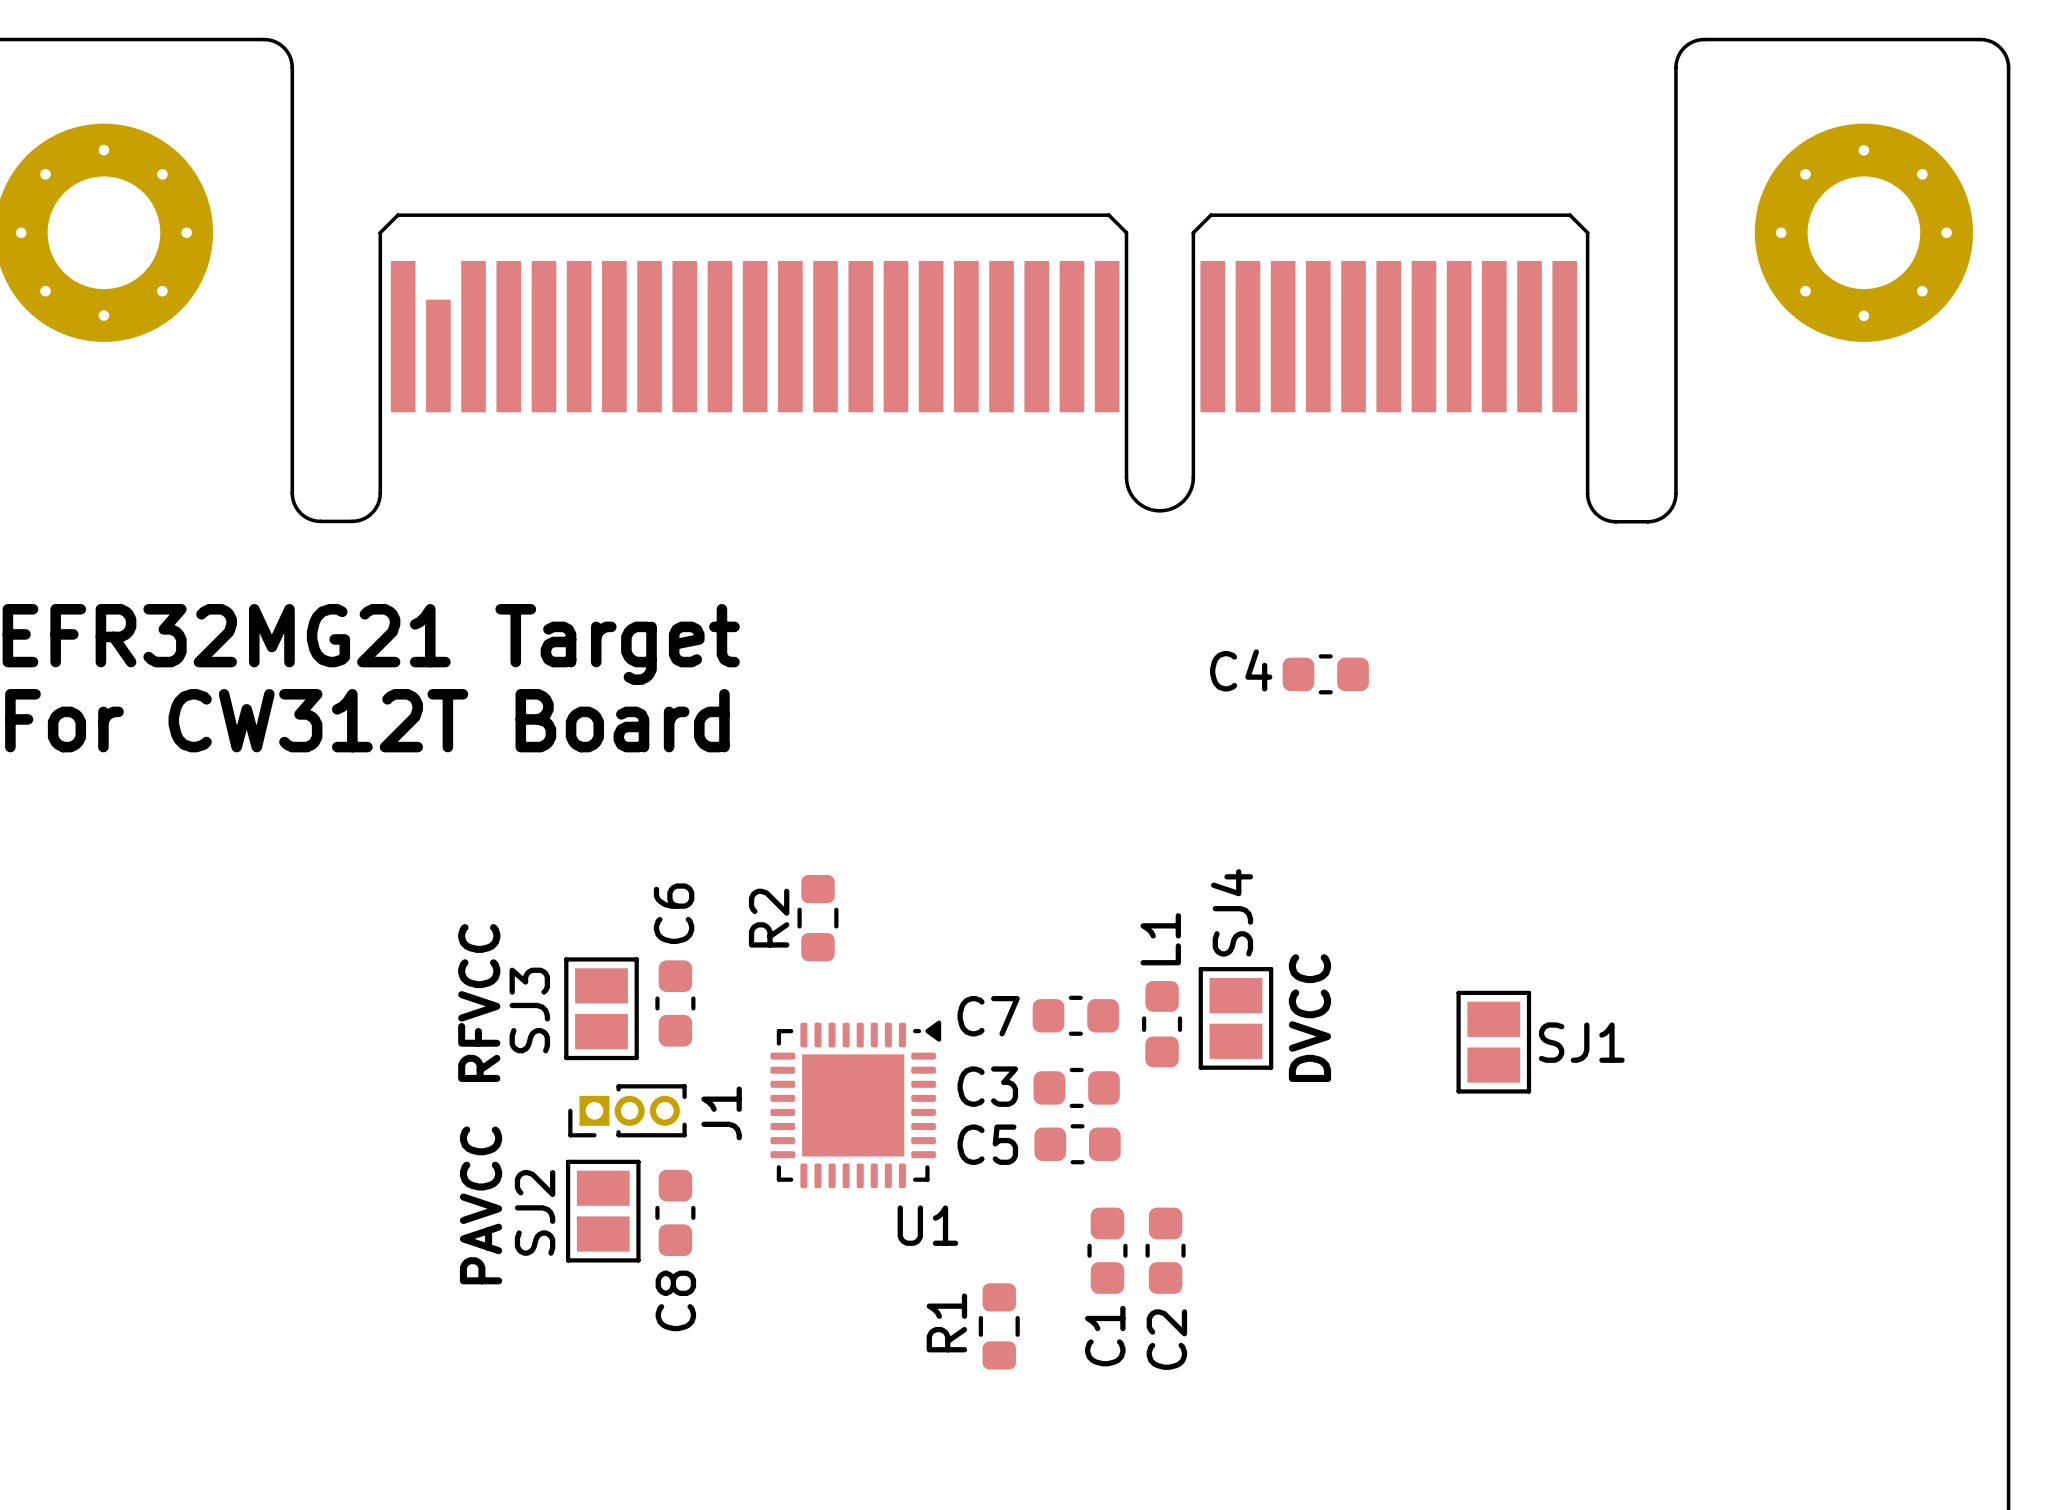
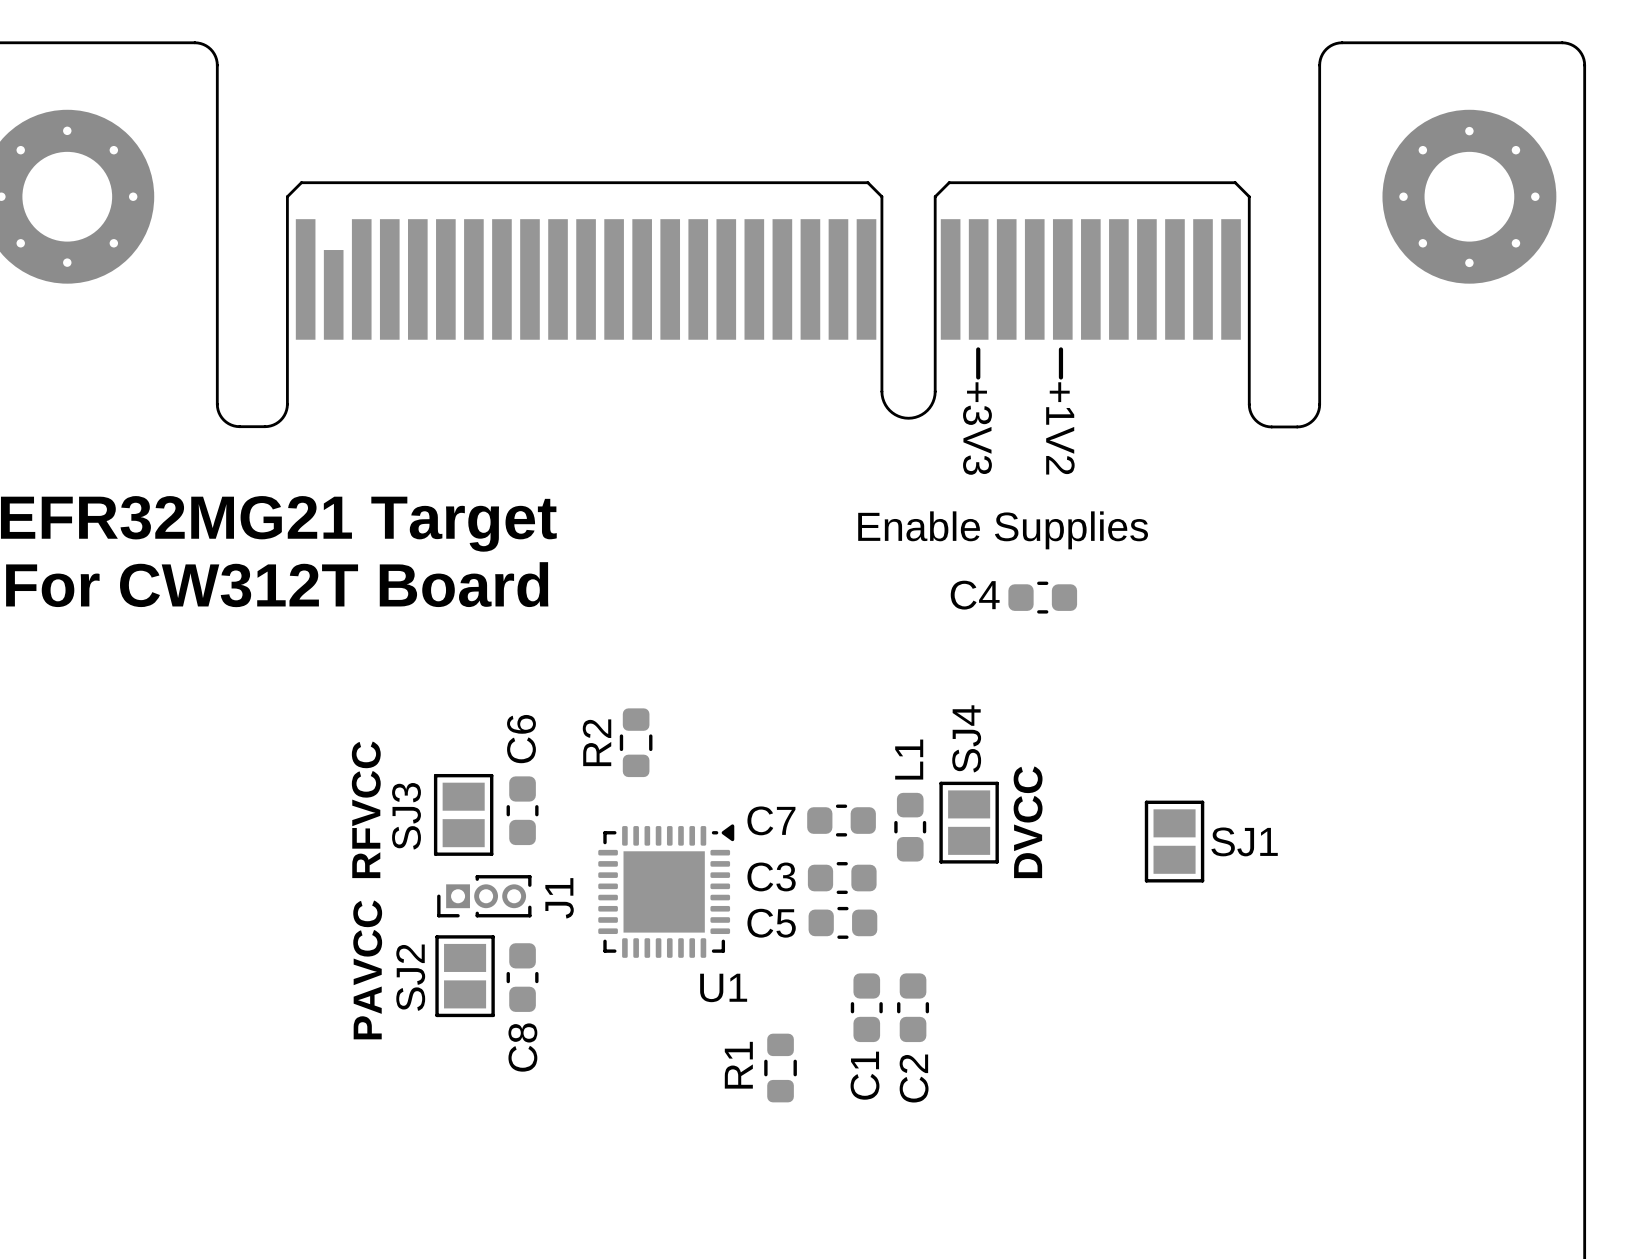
line: none -> (978, 349) (978, 377)
line: none -> (1060, 349) (1060, 377)
text: none -> +3V3 (977, 428)
text: none -> +1V2 (1060, 428)
text: none -> Enable Supplies (1003, 530)
C4 position: (1325, 674) -> (1042, 597)

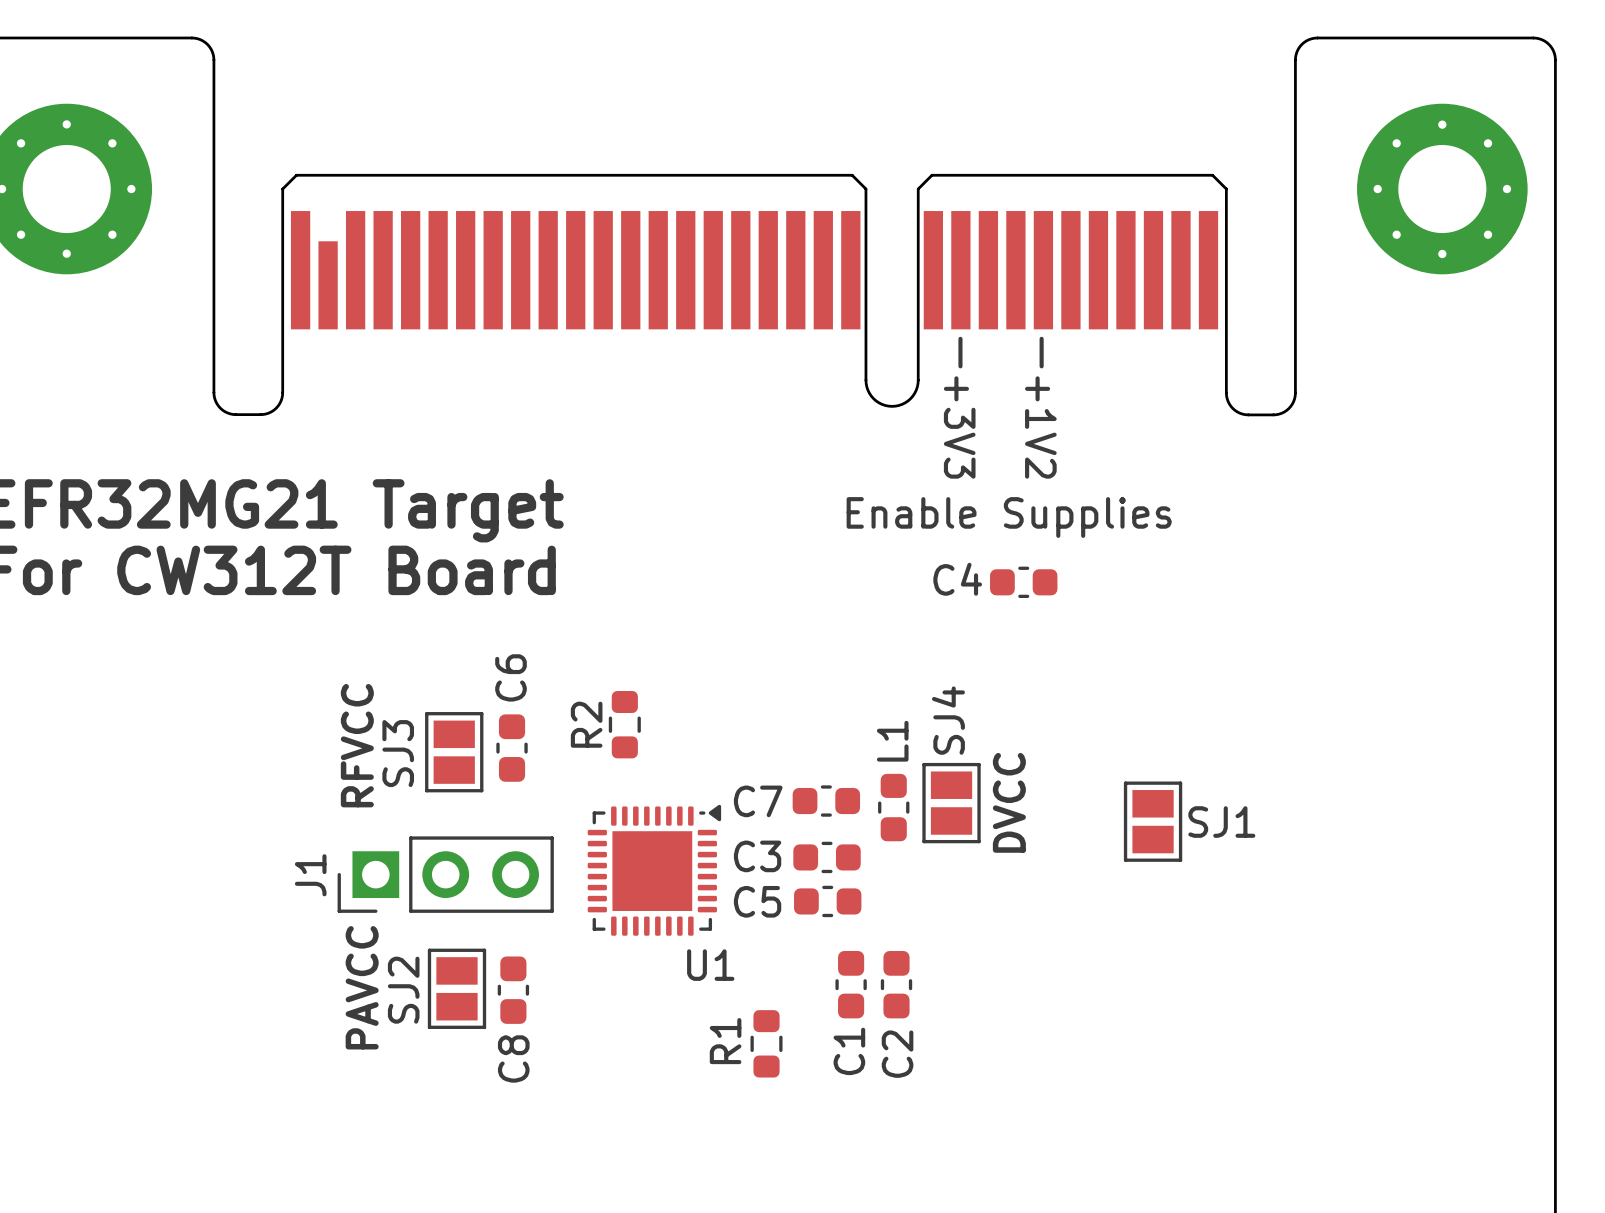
text position: RFVCC (366, 809) -> RFVCC (357, 745)
C6 position: (522, 810) -> (512, 748)
SJ3 position: (463, 814) -> (454, 752)
J1 footprint: [437, 875, 532, 918] -> [337, 836, 554, 913]
J1 name position: J1 (559, 898) -> J1 (310, 875)
text position: PAVCC (367, 969) -> PAVCC (362, 987)
SJ2 position: (465, 976) -> (456, 988)
C8 position: (522, 977) -> (513, 990)

